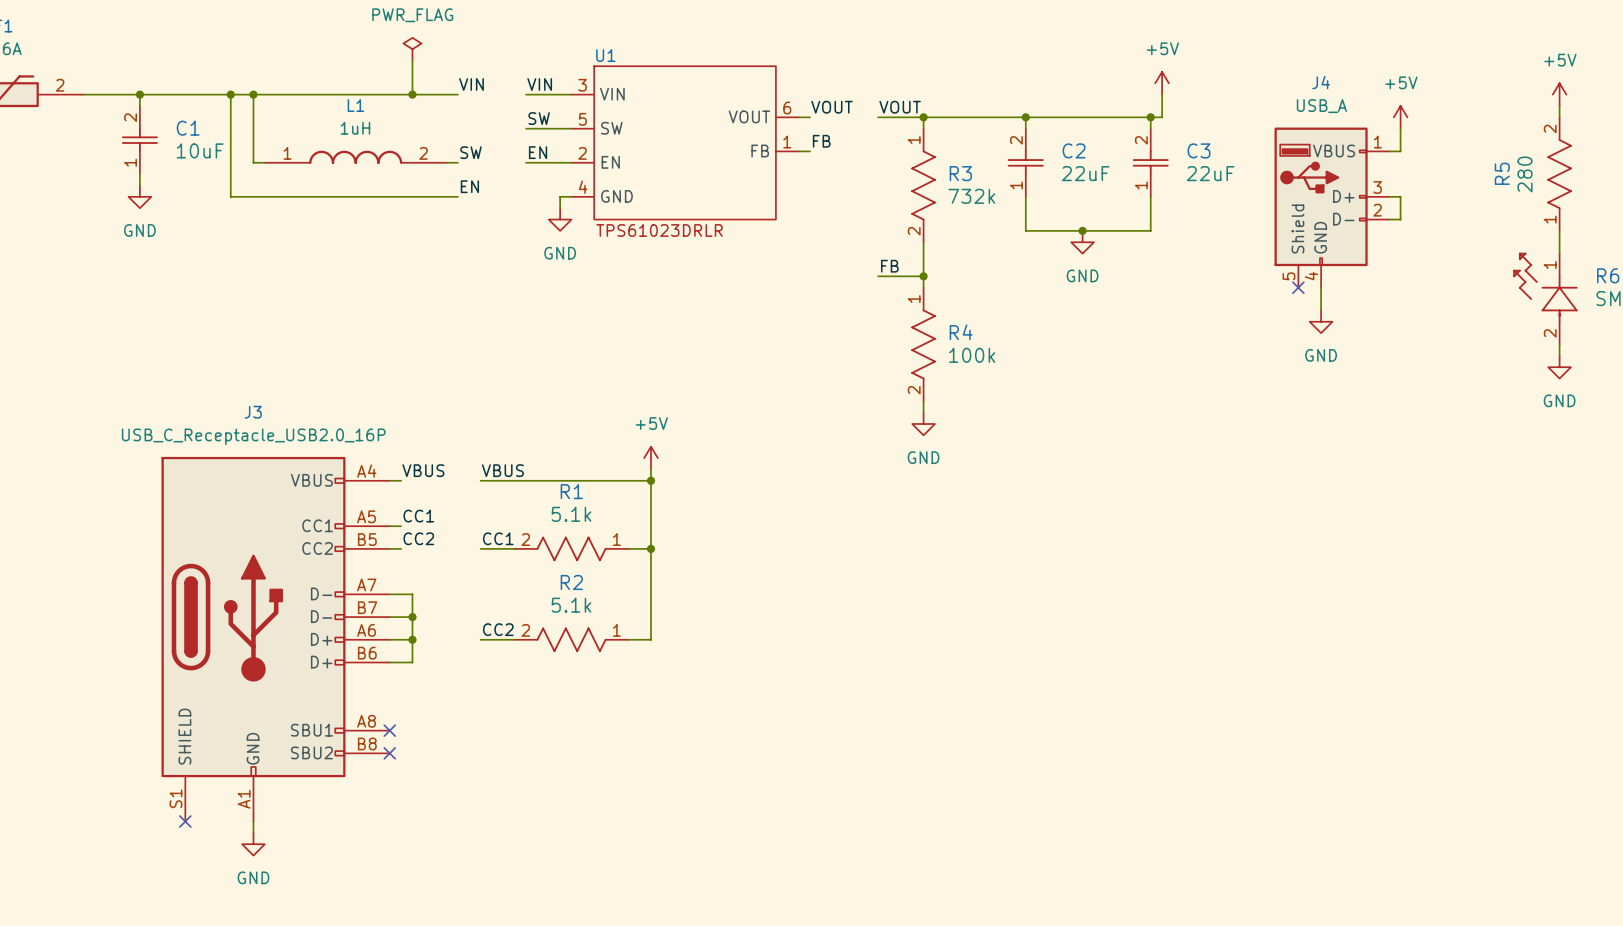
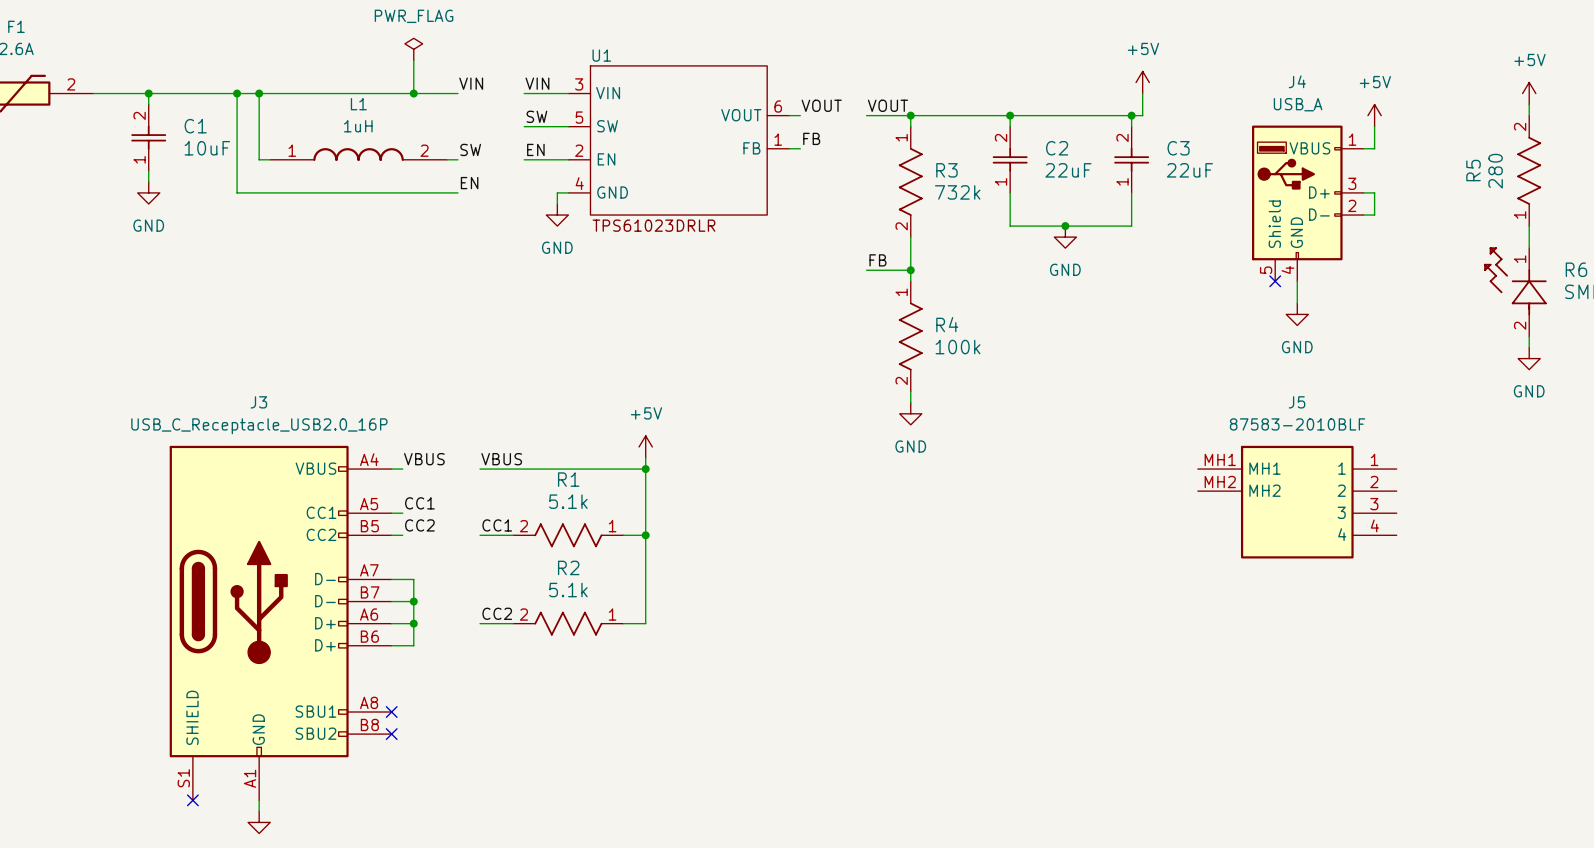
J5: none -> 87583-2010BLF (1297, 502)

